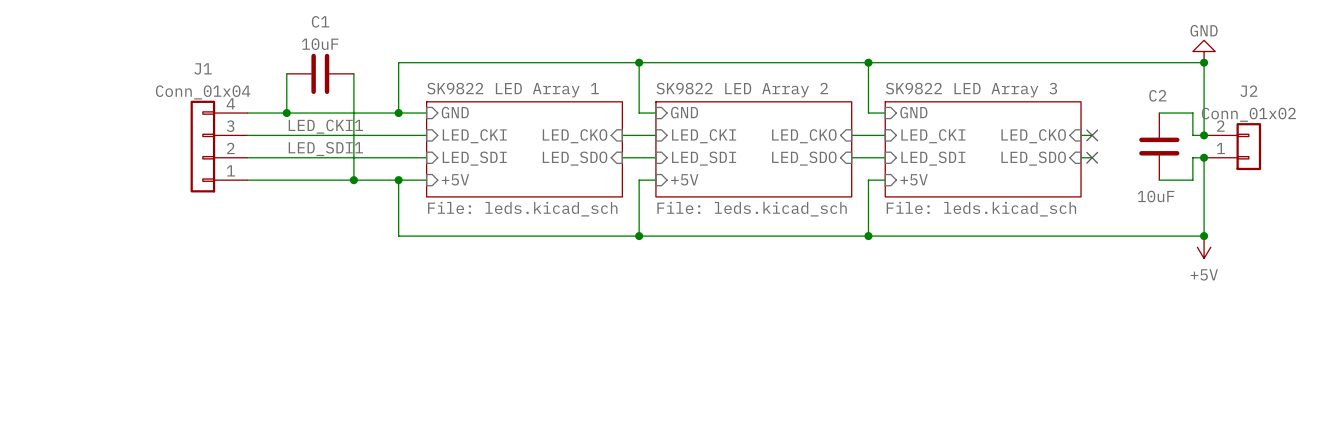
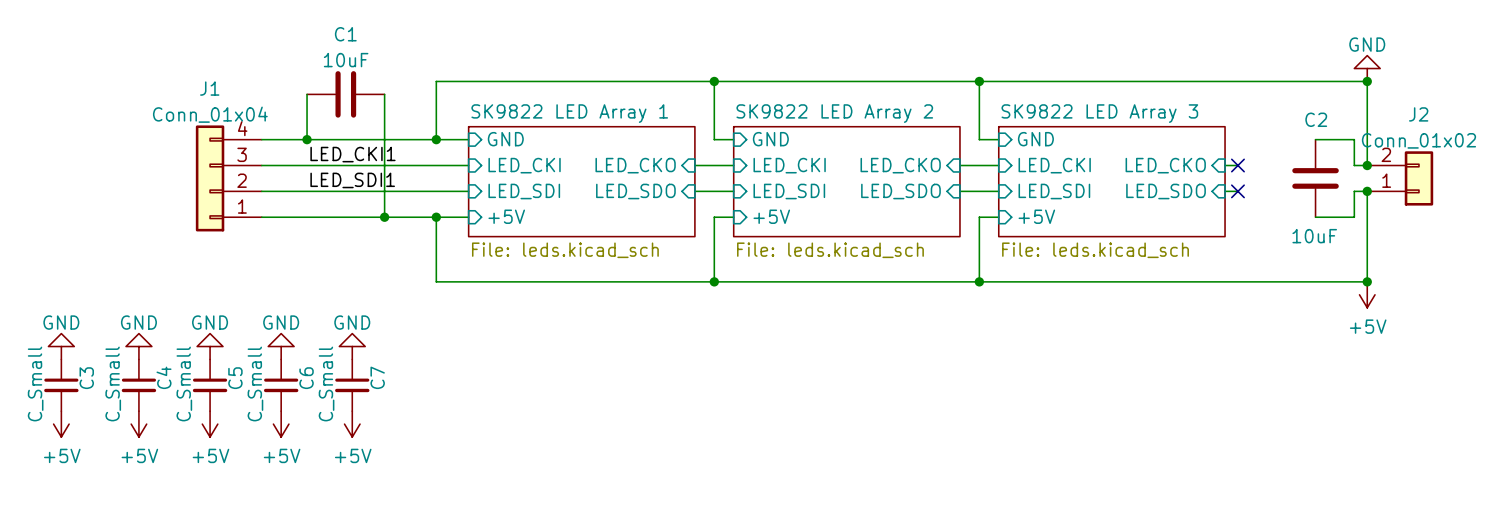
power symbol: none -> GND (61, 346)
power symbol: none -> GND (138, 346)
power symbol: none -> GND (210, 346)
power symbol: none -> GND (281, 346)
power symbol: none -> GND (352, 346)
C3: none -> C_Small (61, 385)
C4: none -> C_Small (138, 385)
C5: none -> C_Small (210, 385)
C6: none -> C_Small (281, 385)
C7: none -> C_Small (352, 385)
power symbol: none -> +5V (61, 424)
power symbol: none -> +5V (138, 424)
power symbol: none -> +5V (210, 424)
power symbol: none -> +5V (281, 424)
power symbol: none -> +5V (352, 424)

